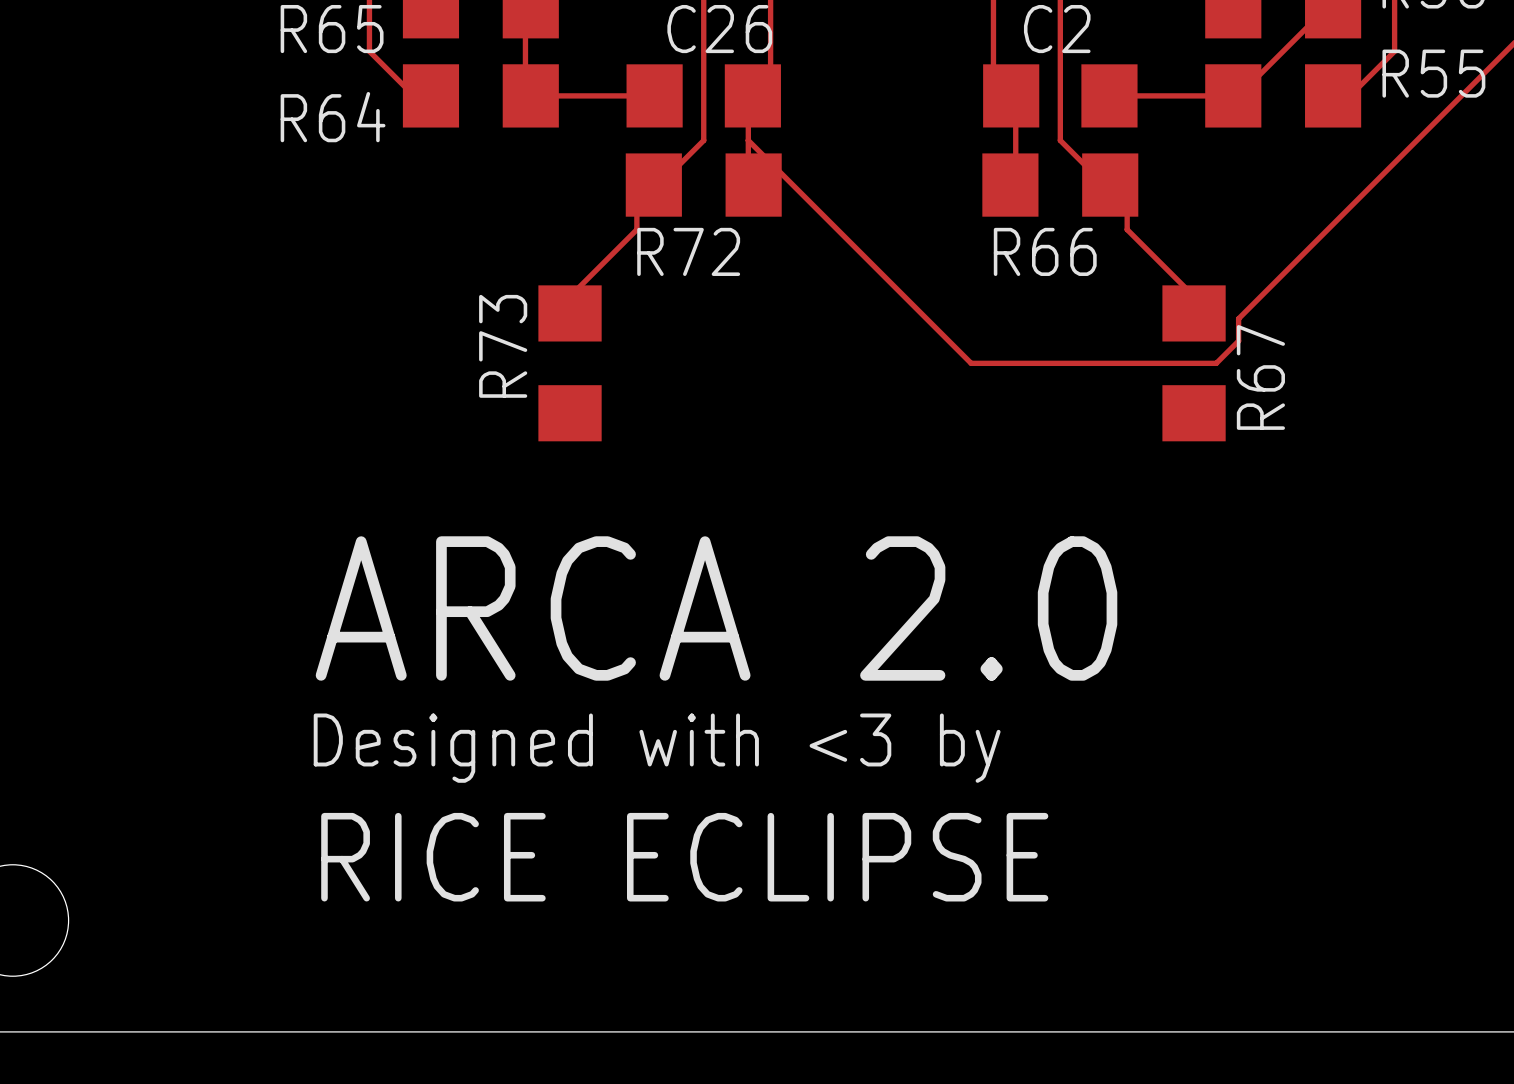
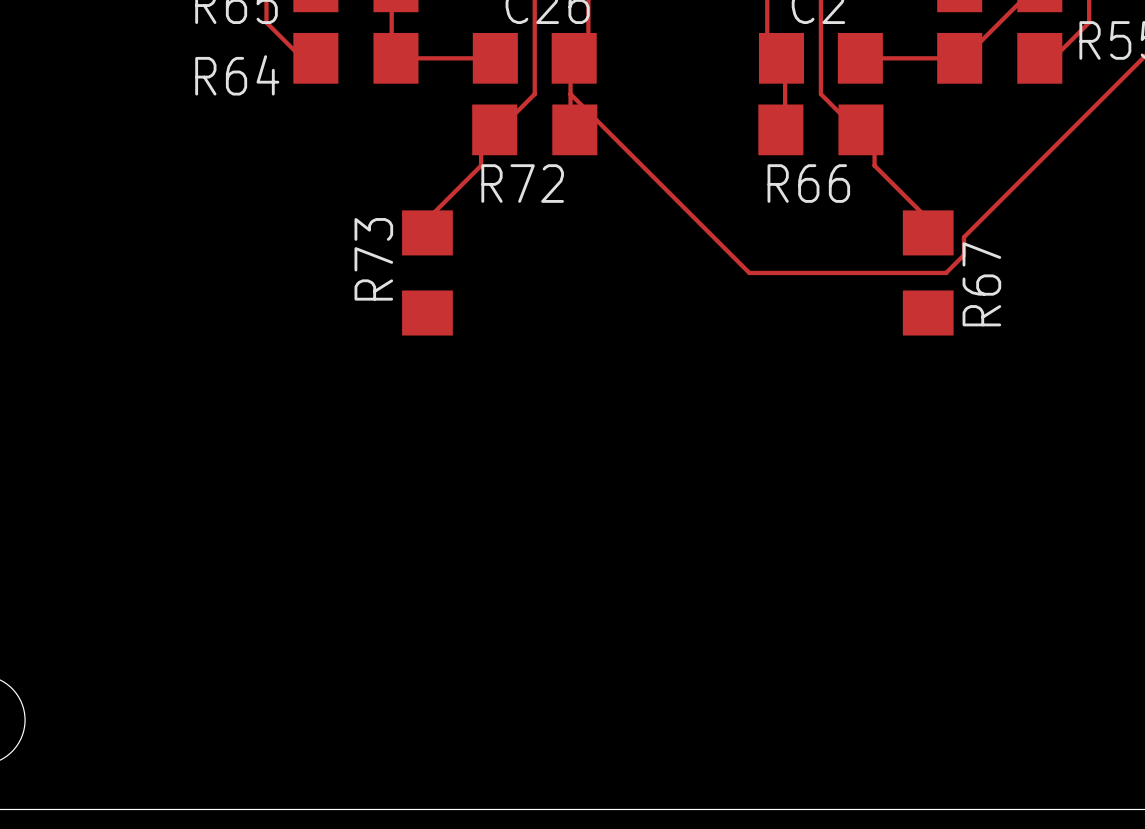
text: ARCA 2.0 (716, 608) -> none
text: Designed with <3 by (657, 748) -> none
text: RICE ECLIPSE (684, 857) -> none

